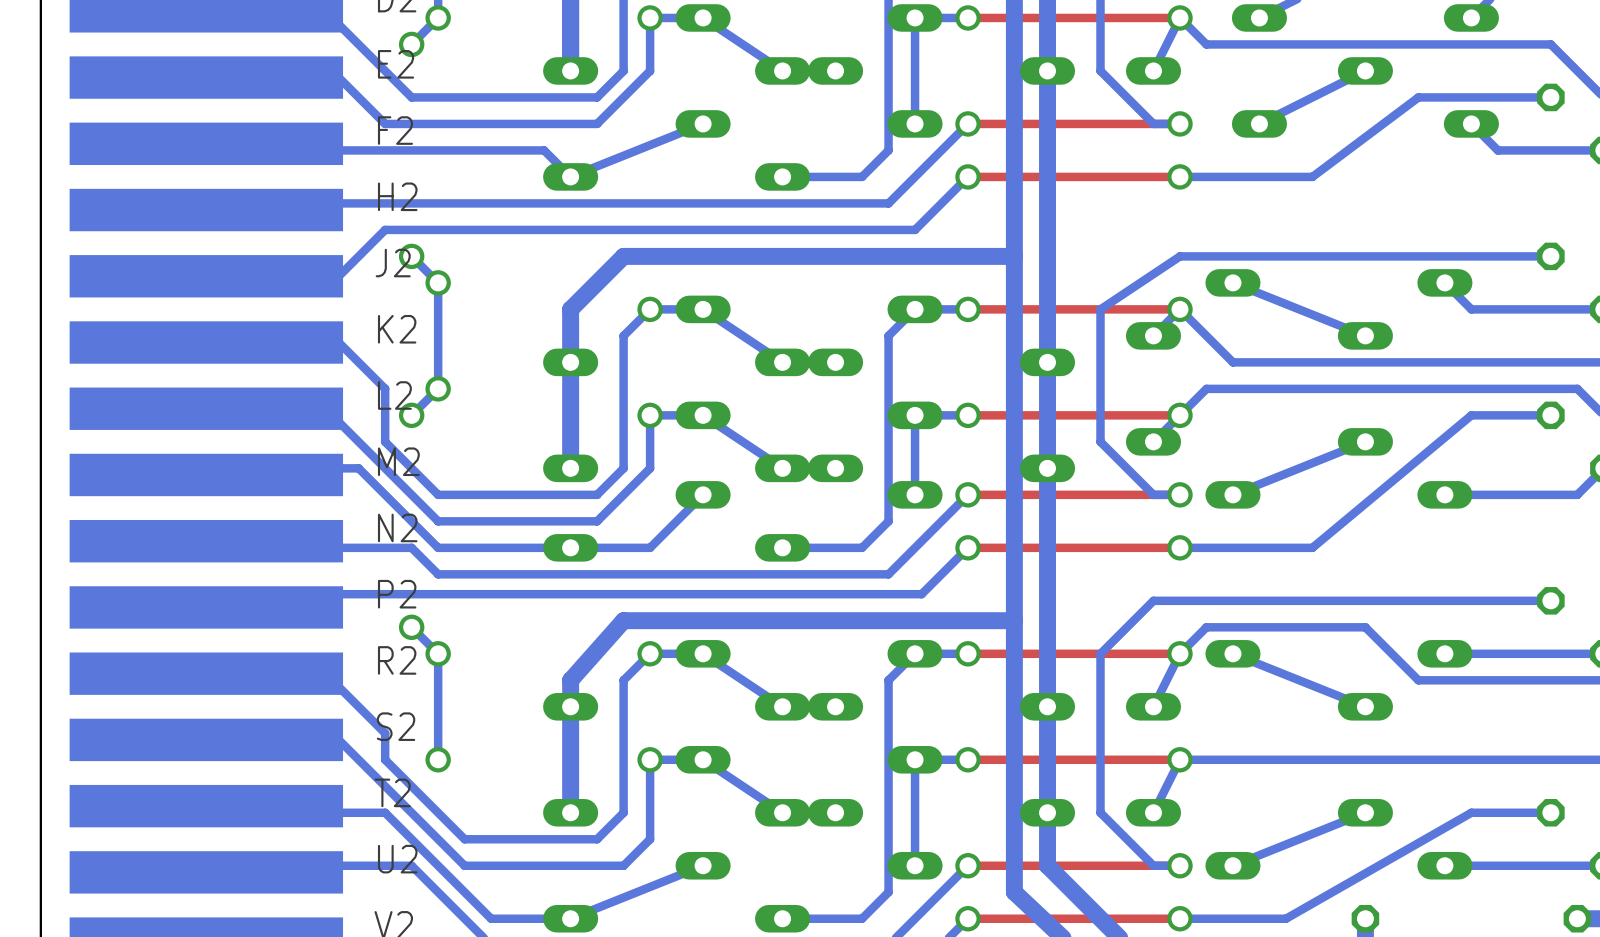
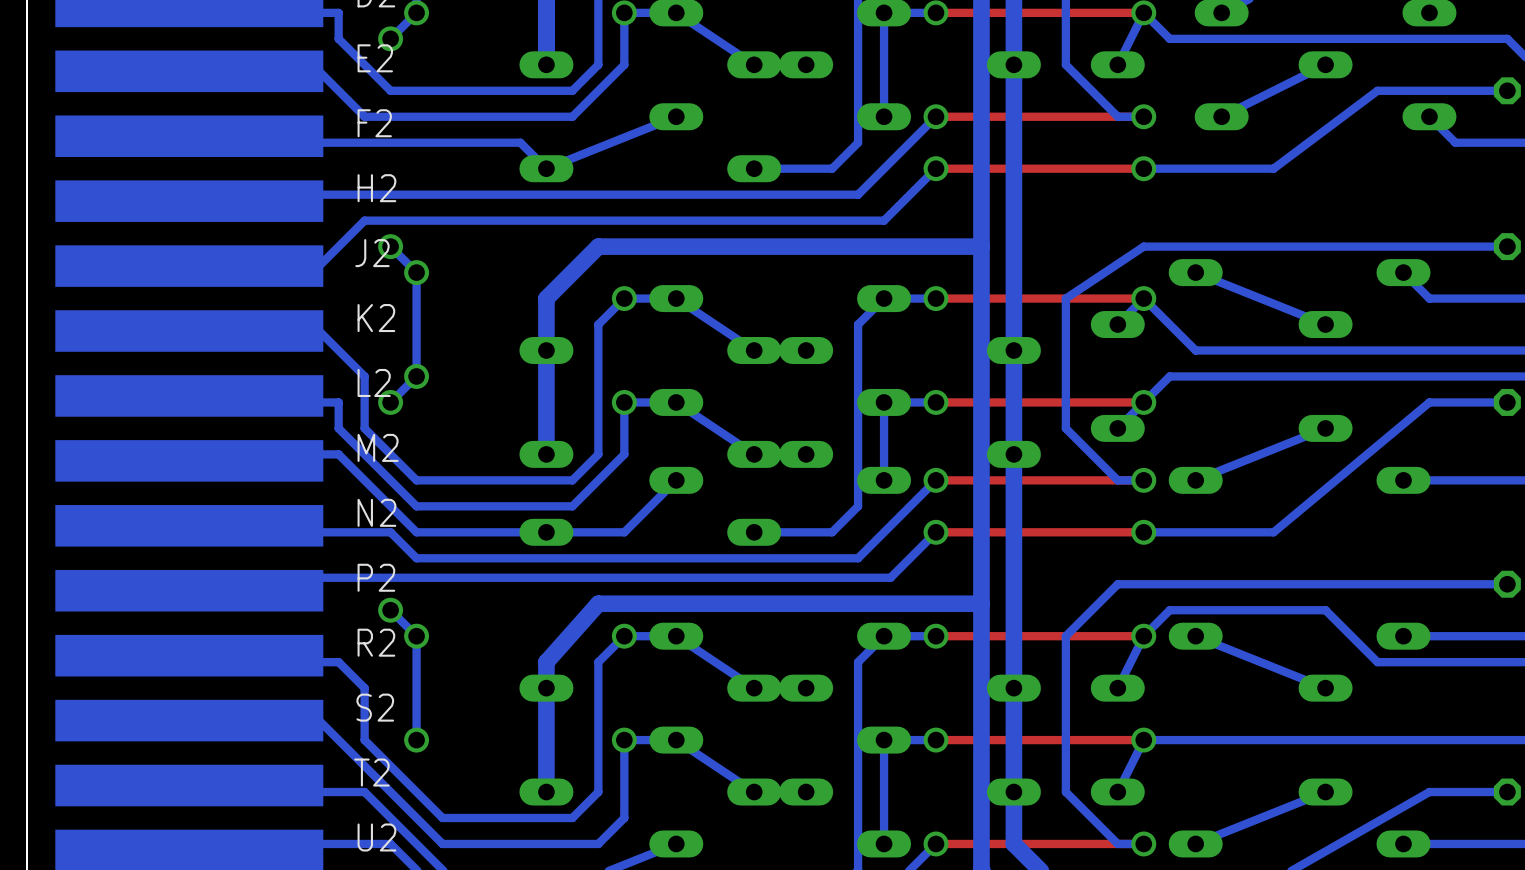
bottom track: (332, 17) (358, 44) -> (312, 12) (338, 12) (338, 38)
bottom track: (332, 415) (358, 441) -> (312, 402) (338, 402) (338, 428)
bottom track: (332, 680) (385, 733) -> (312, 662) (338, 662) (364, 688) (364, 714)

